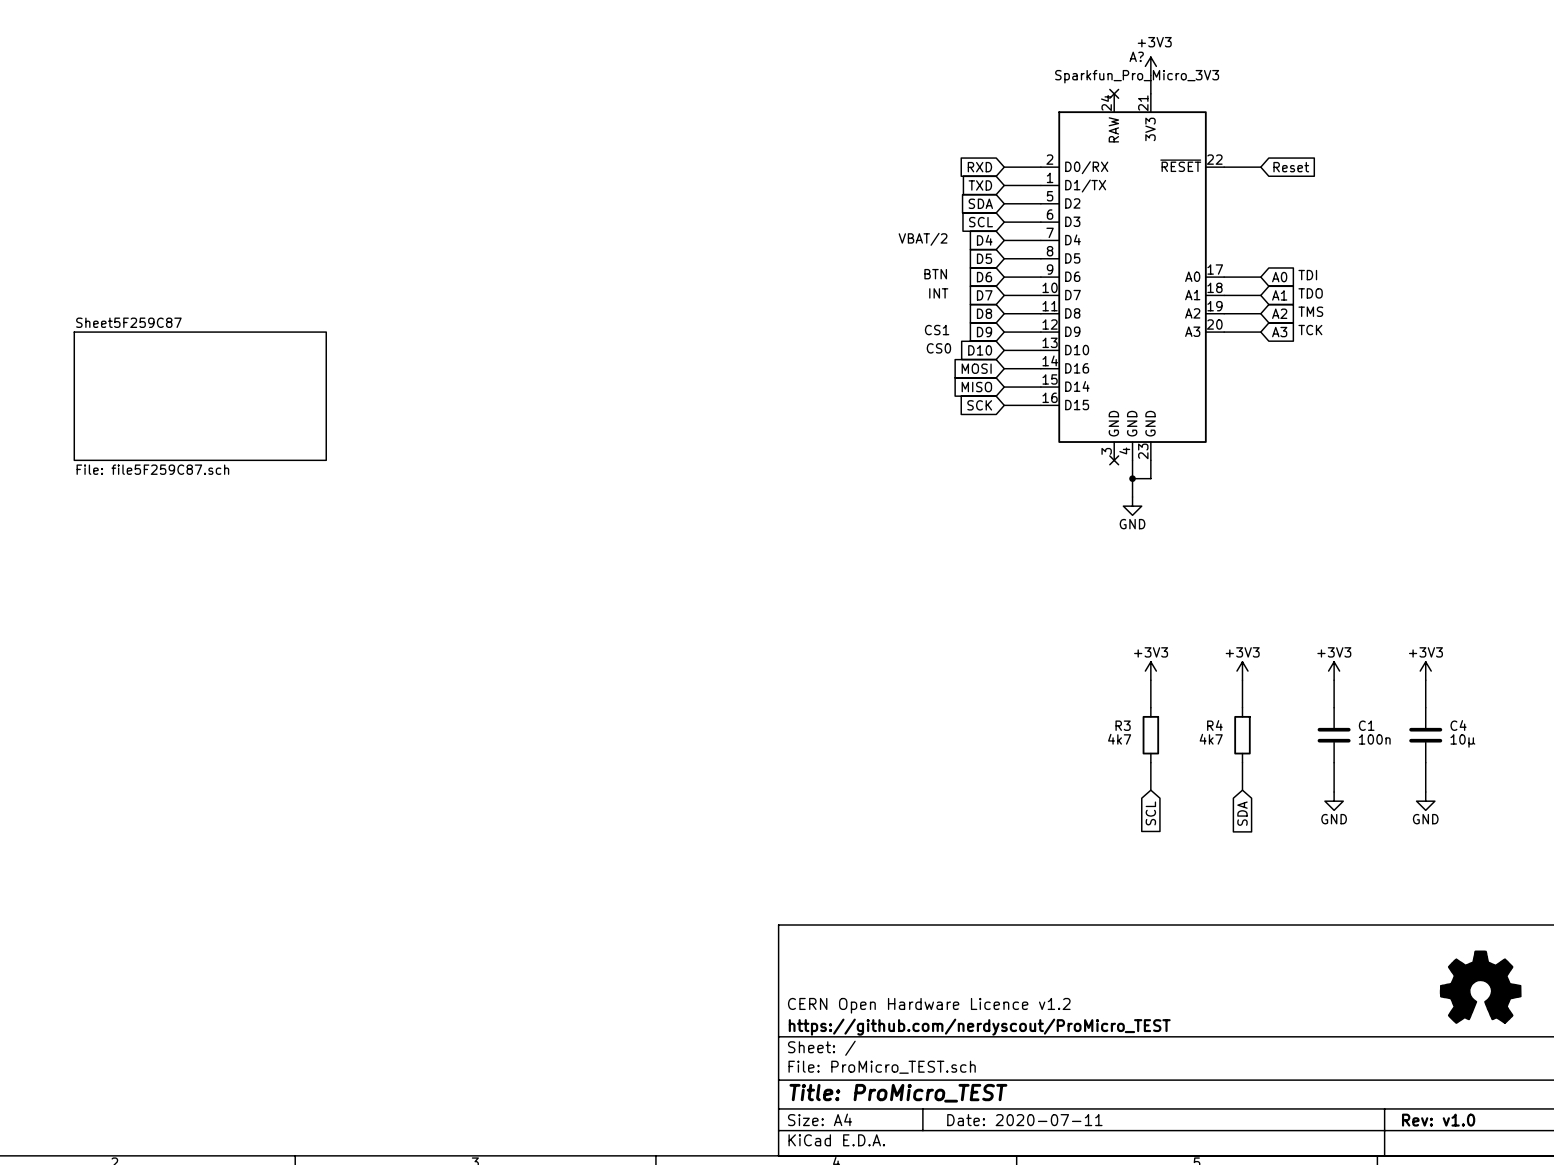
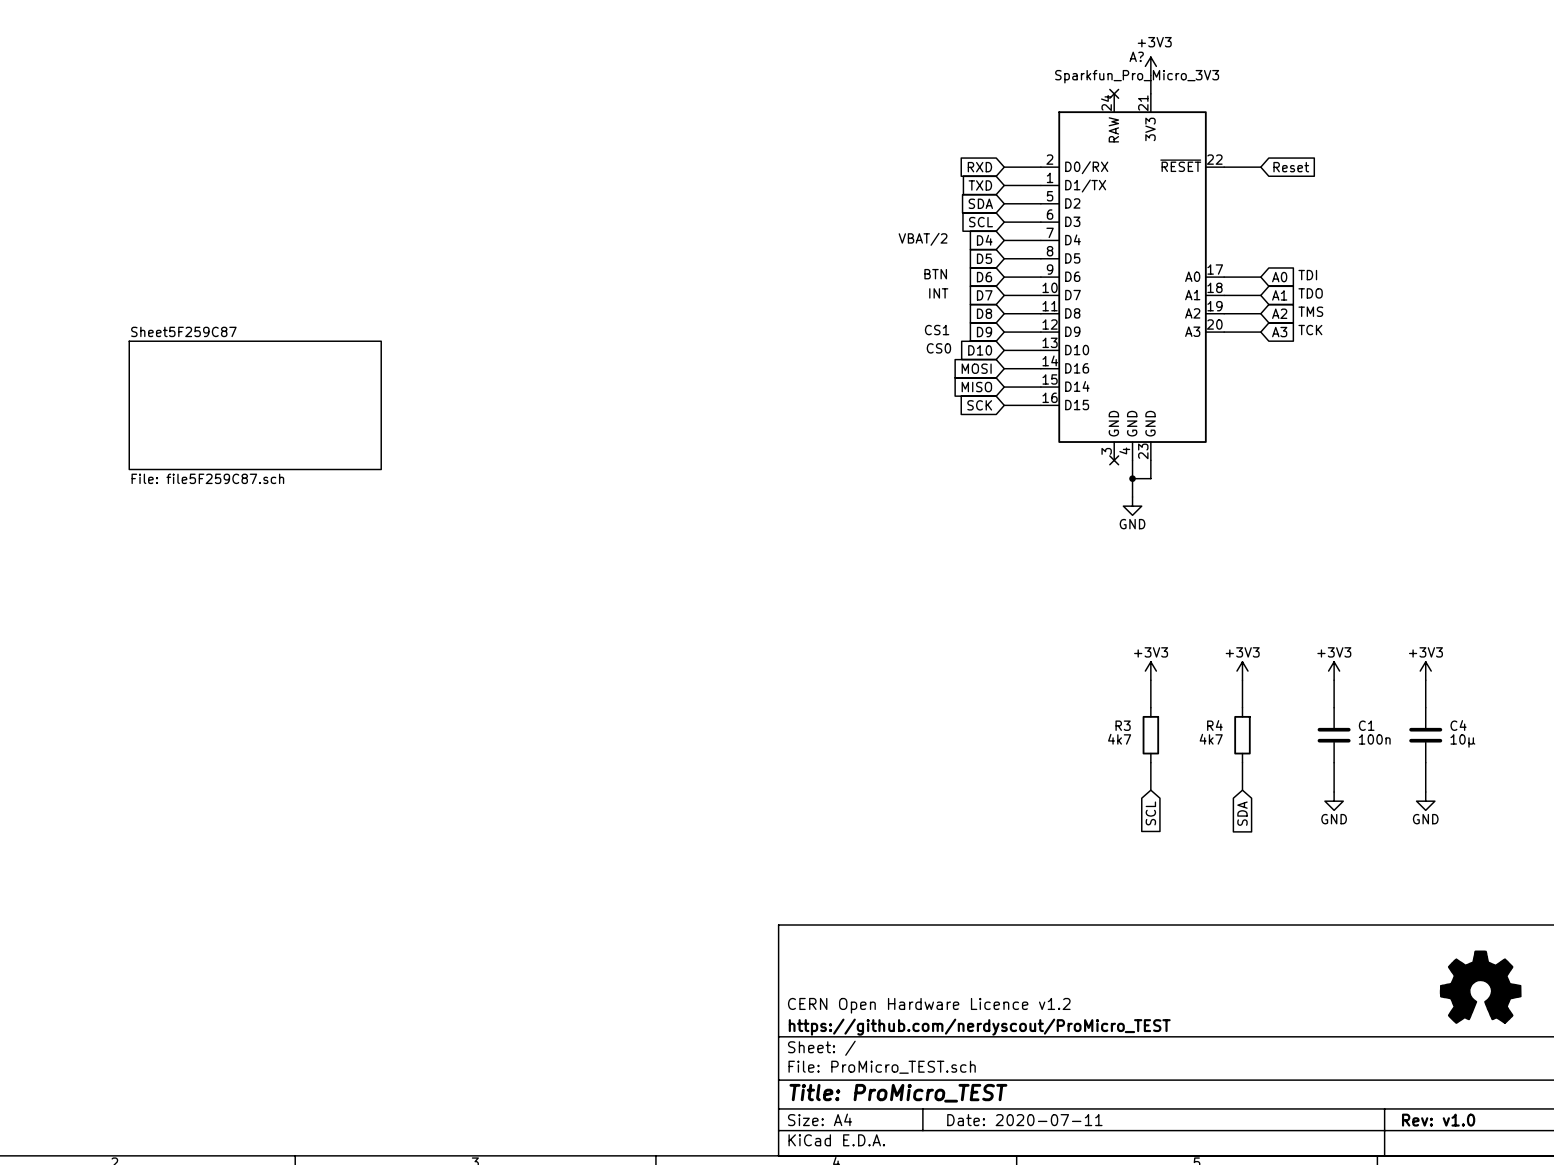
sheet Sheet5F259C87 position: (200, 396) -> (255, 405)

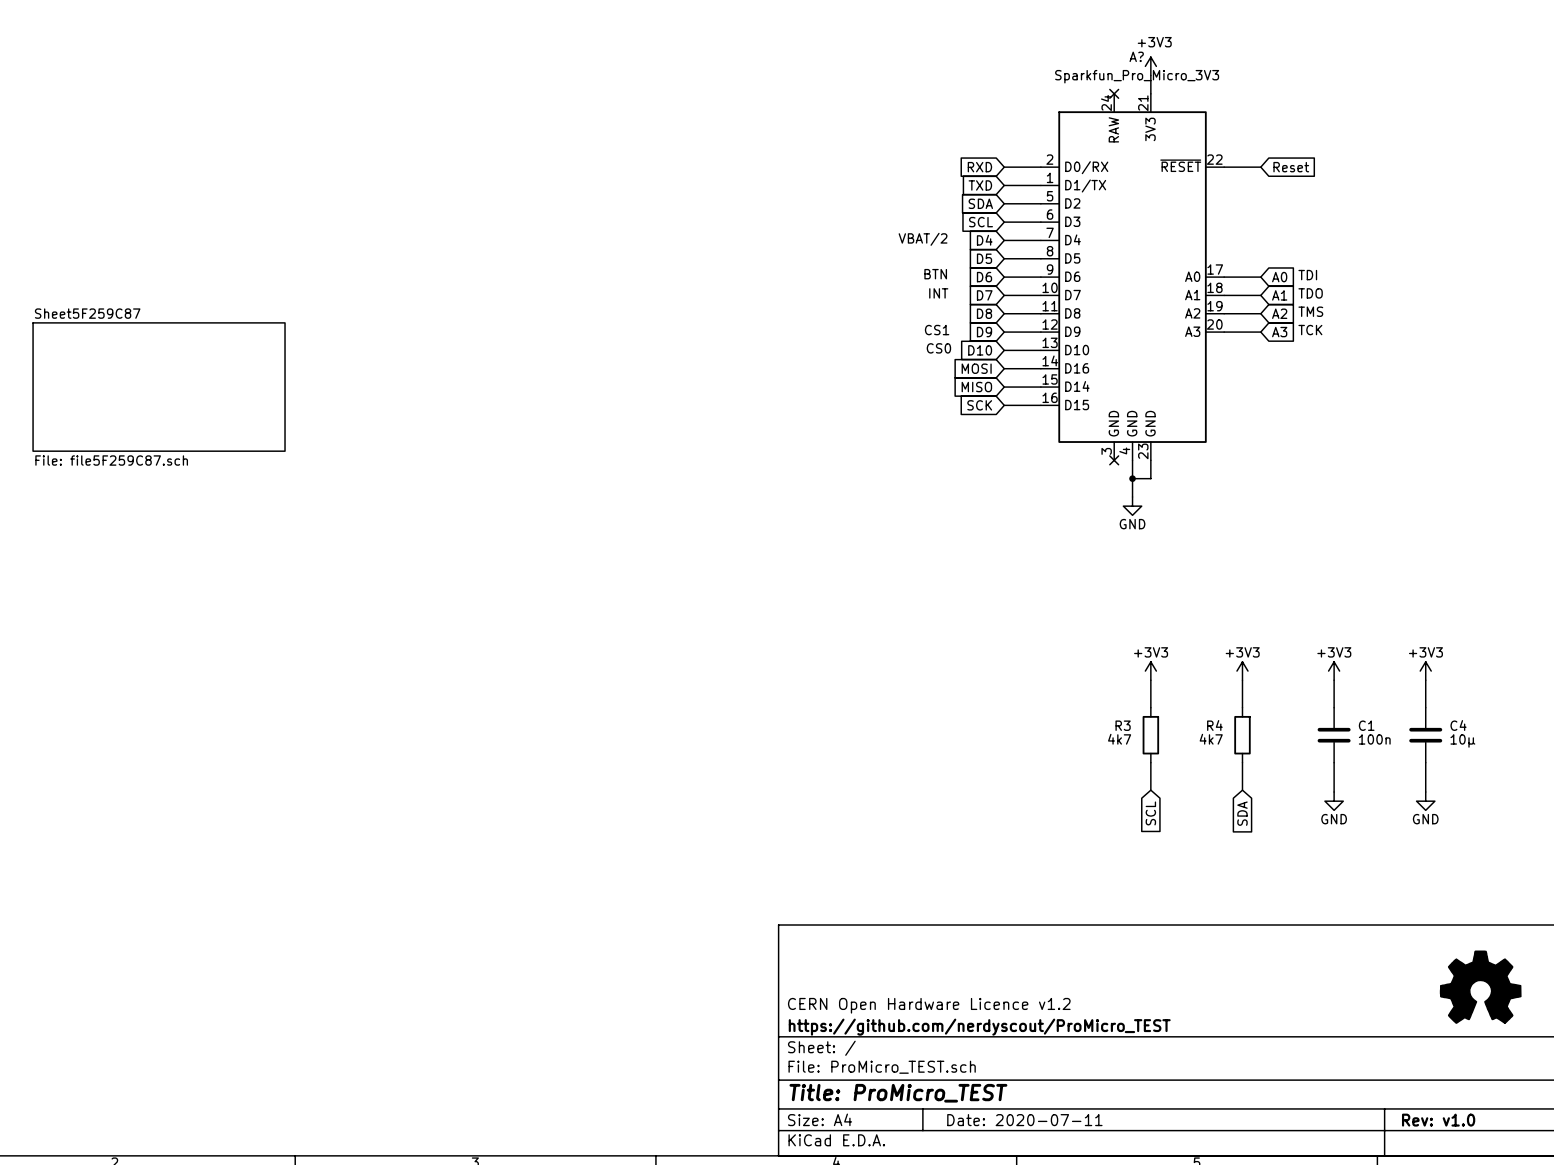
sheet Sheet5F259C87 position: (255, 405) -> (159, 387)

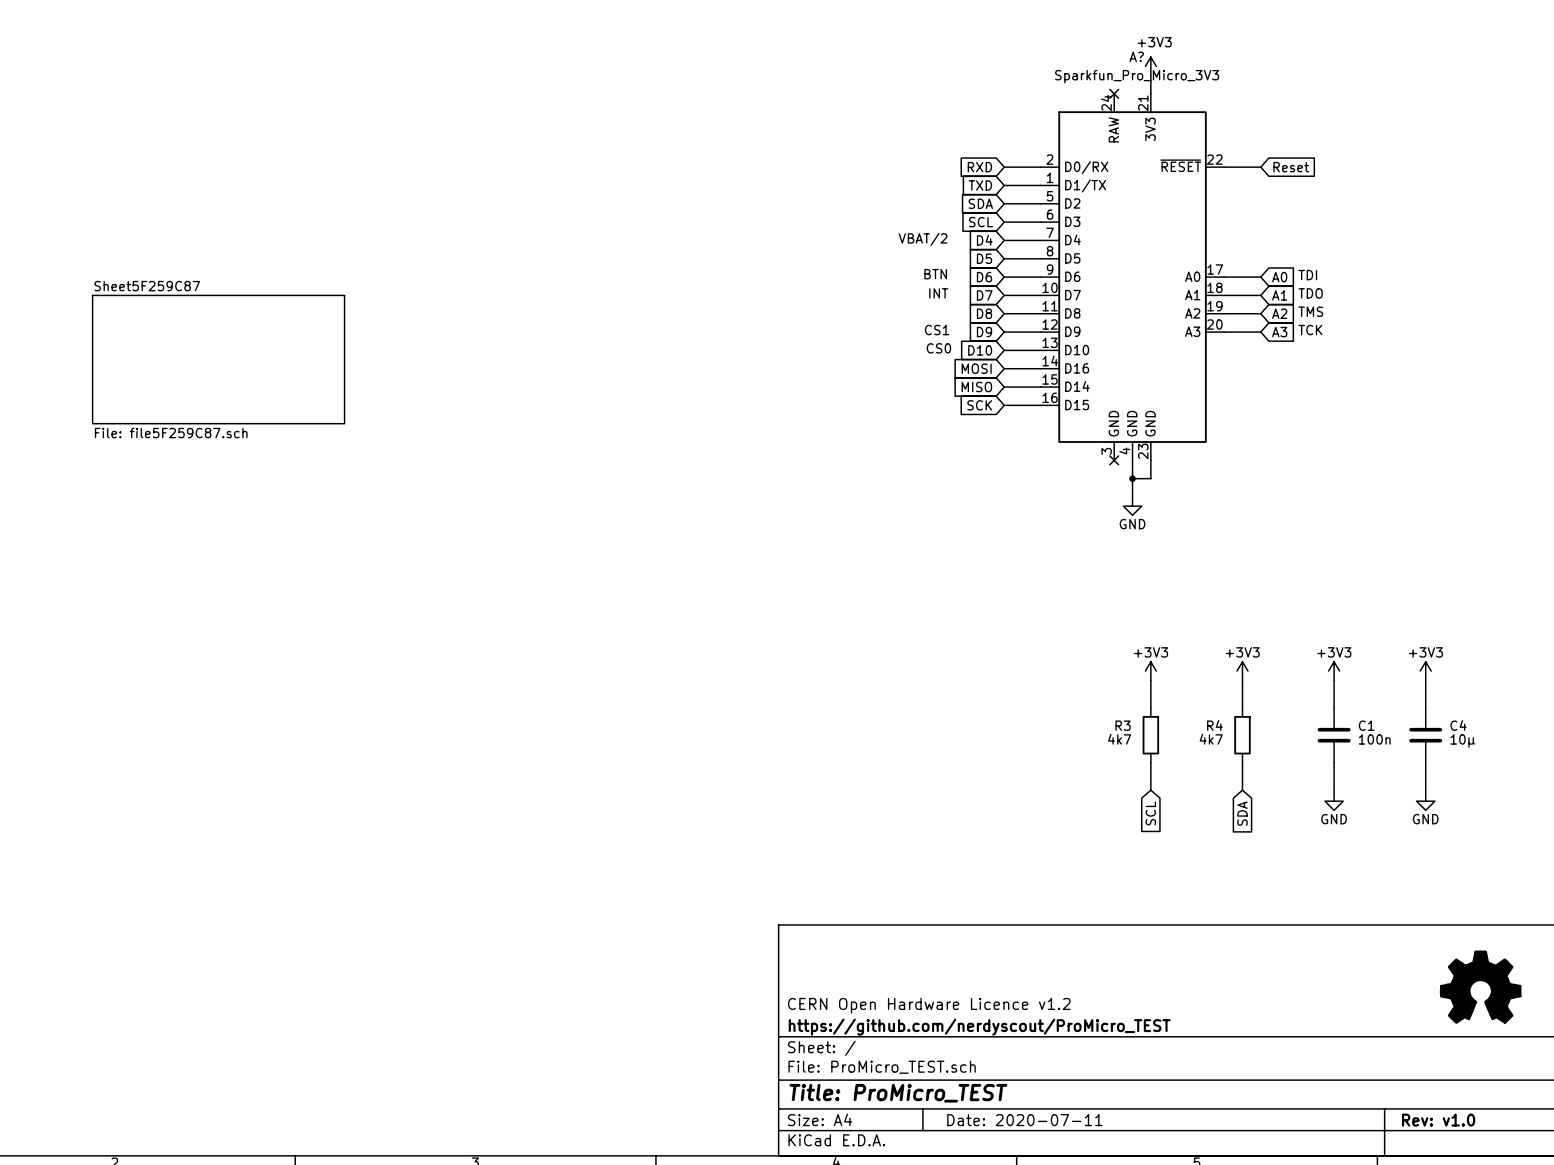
sheet Sheet5F259C87 position: (159, 387) -> (218, 359)

